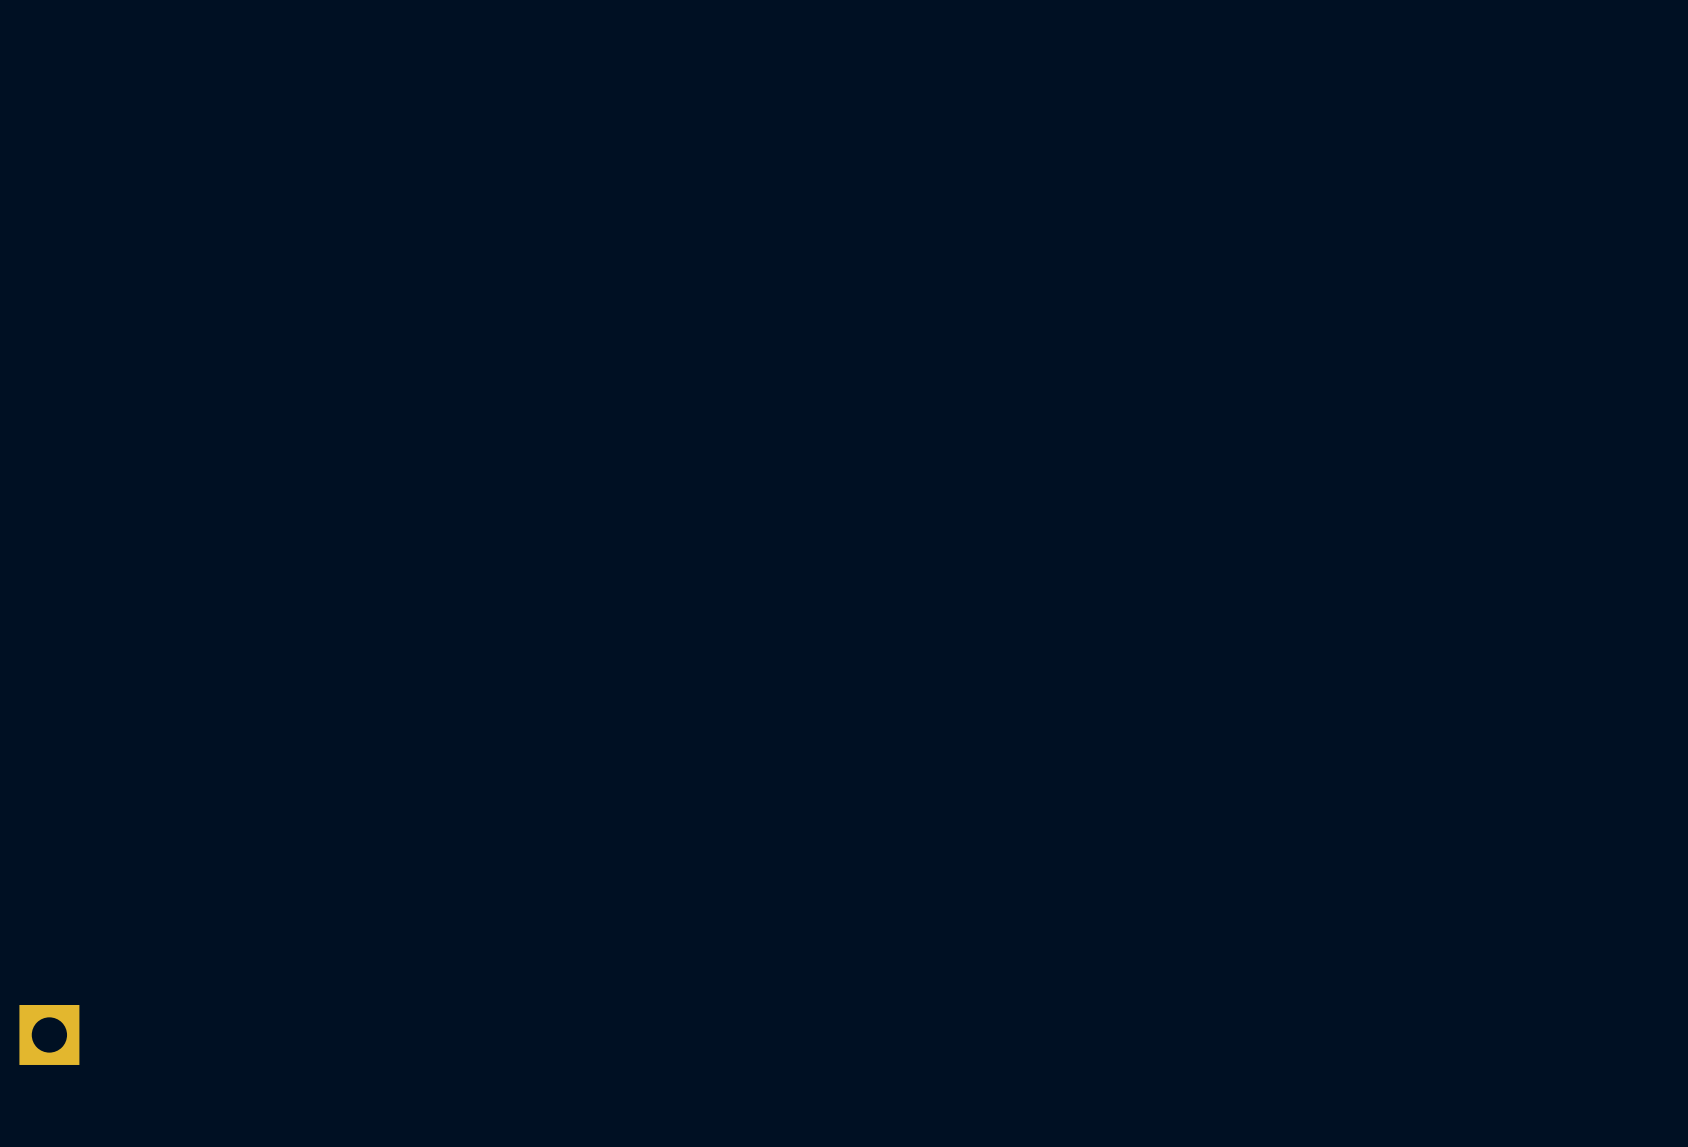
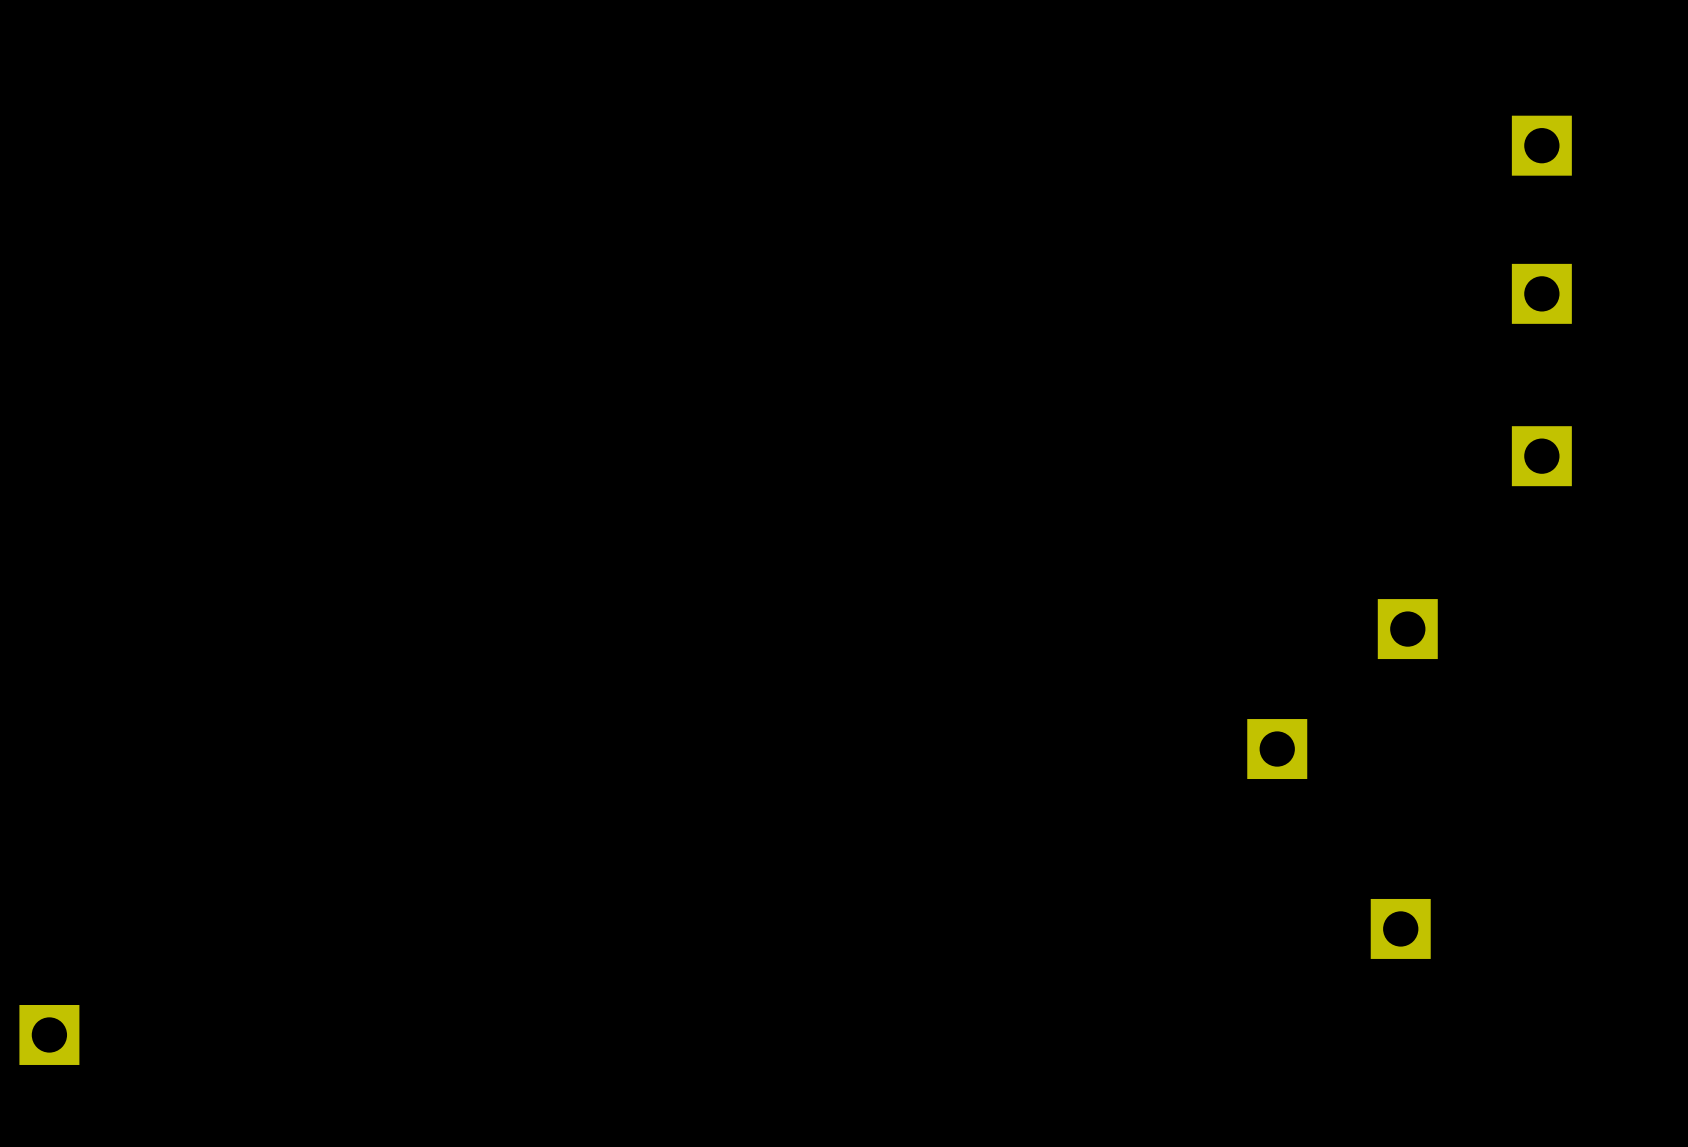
part: none -> (1541, 145)
part: none -> (1541, 293)
part: none -> (1541, 456)
part: none -> (1407, 629)
part: none -> (1277, 749)
part: none -> (1400, 928)

